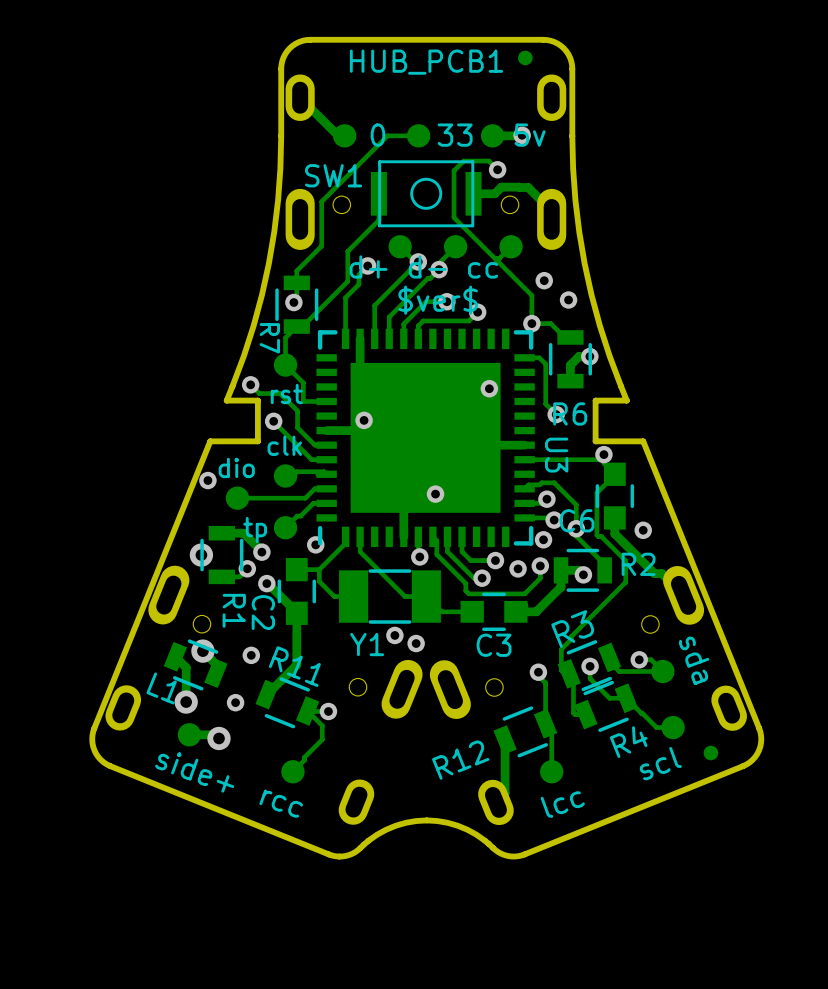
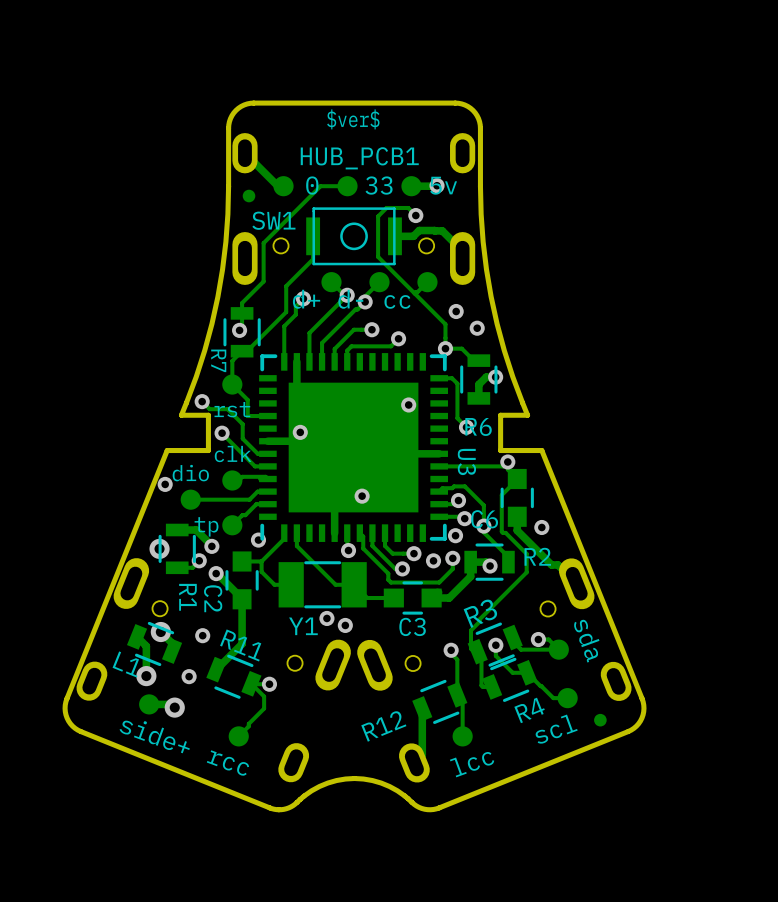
part position: (525, 57) -> (249, 196)
text: HUB_PCB1 (426, 62) -> $ver$ (353, 119)
text: none -> HUB_PCB1 (359, 158)
text: $ver$ (438, 300) -> none

